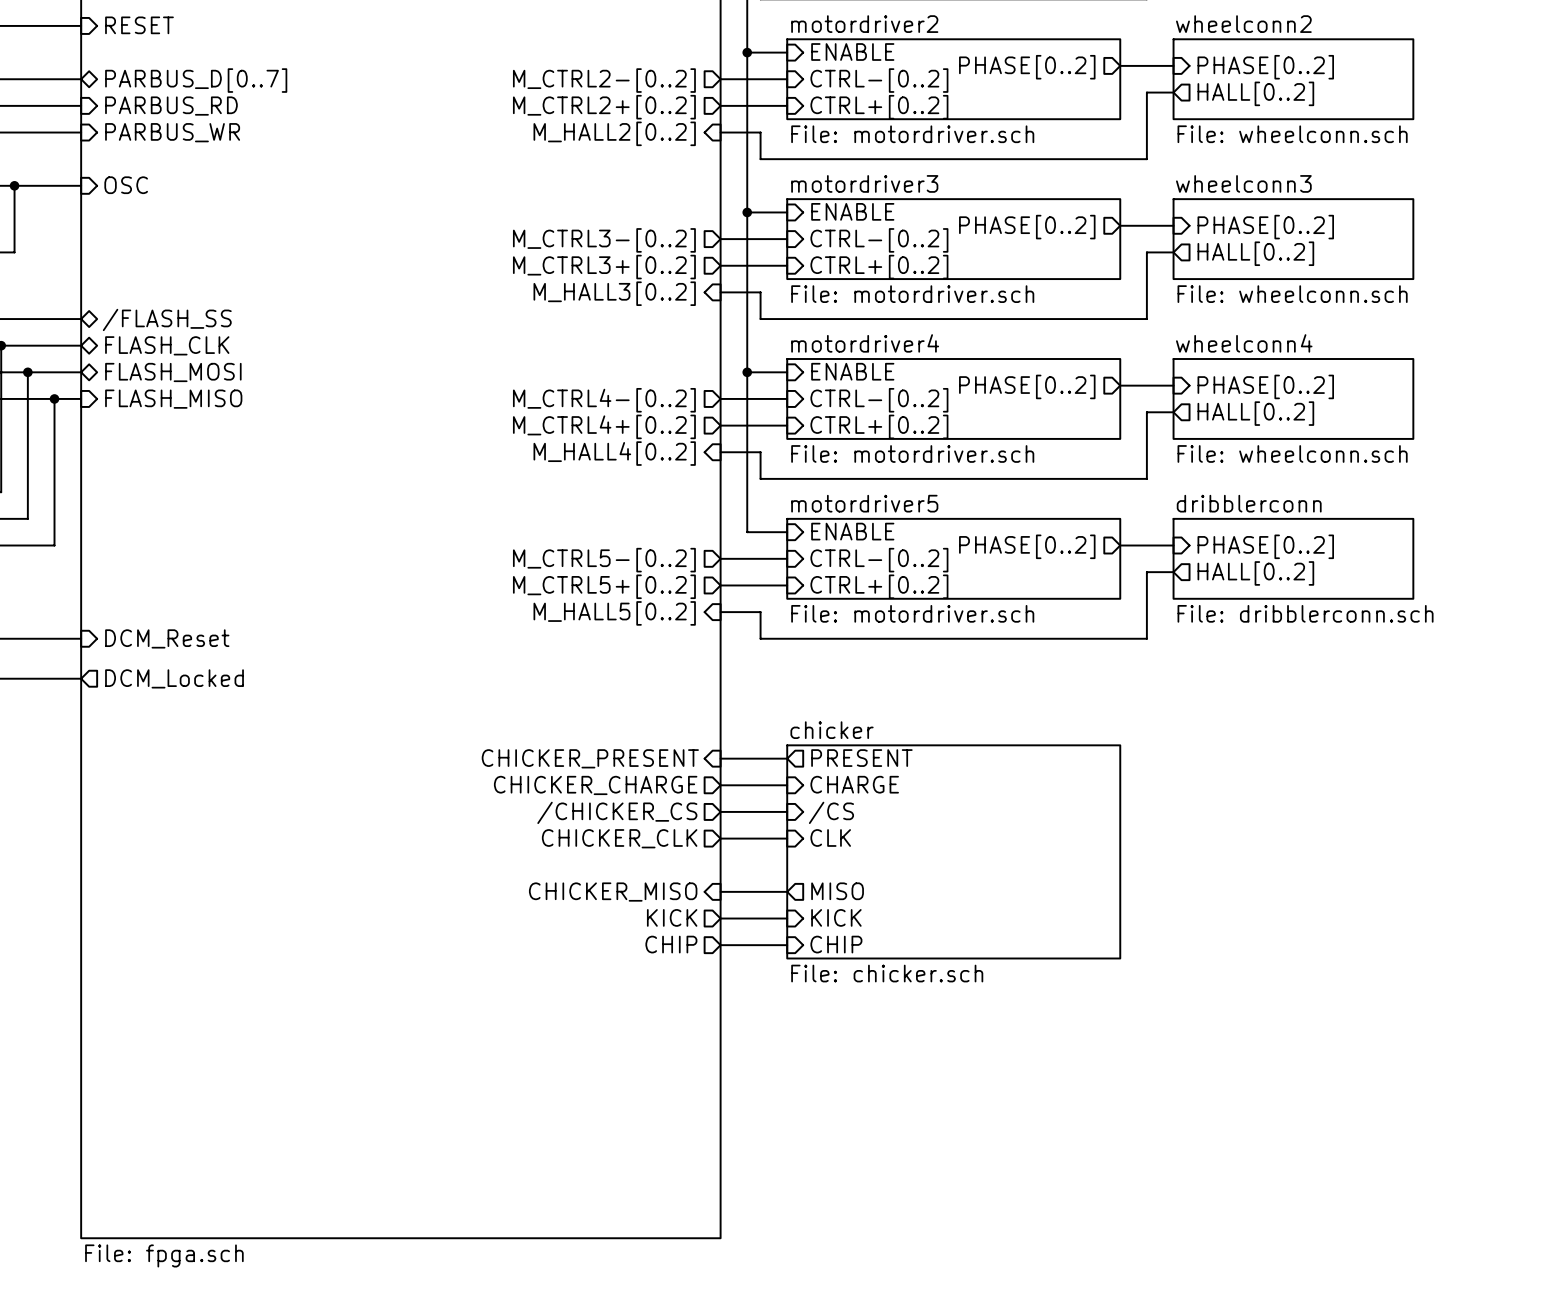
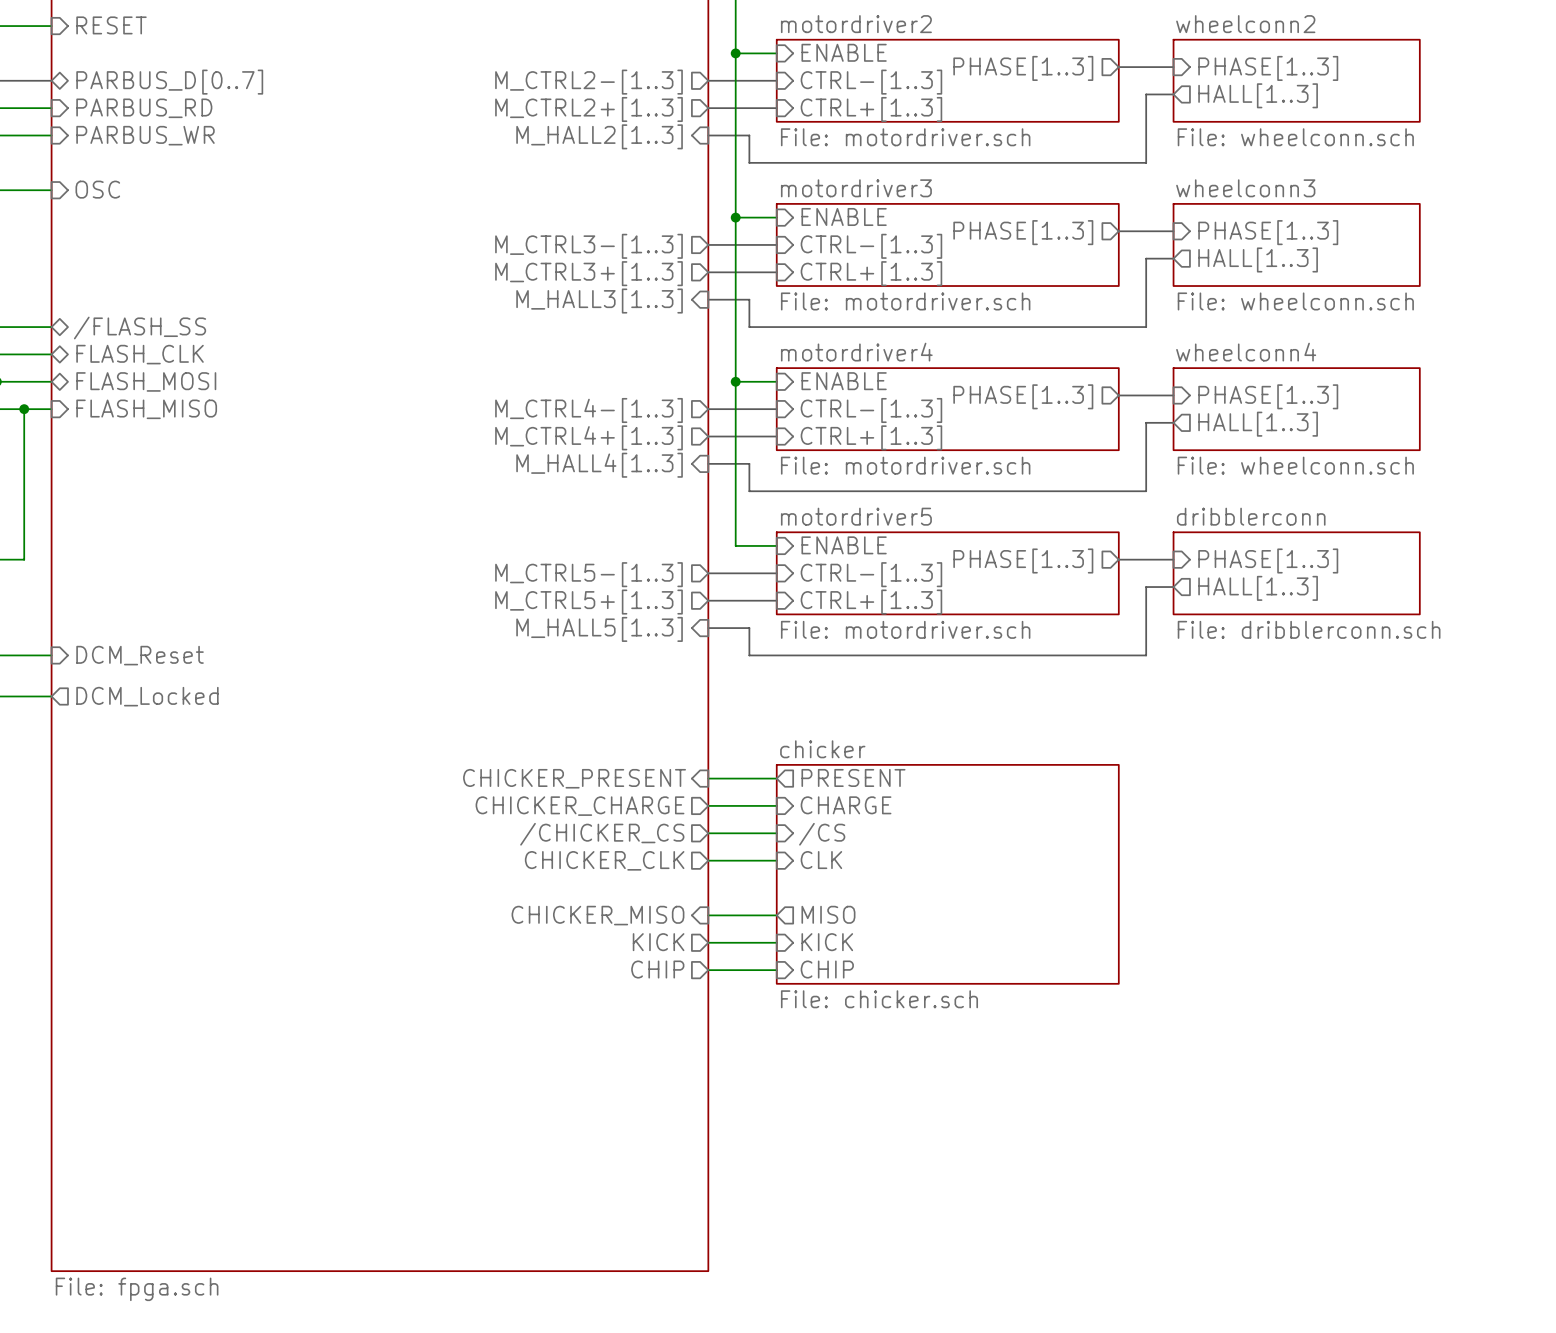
sheet pin: PHASE[0..2] (1027, 67) -> PHASE[1..3] (1023, 68)
sheet pin: PHASE[0..2] (1265, 67) -> PHASE[1..3] (1268, 68)
sheet pin: M_CTRL2-[0..2] (604, 80) -> M_CTRL2-[1..3] (589, 82)
sheet pin: CTRL-[0..2] (879, 80) -> CTRL-[1..3] (871, 82)
sheet pin: HALL[0..2] (1255, 93) -> HALL[1..3] (1258, 95)
sheet pin: M_CTRL2+[0..2] (604, 107) -> M_CTRL2+[1..3] (589, 109)
sheet pin: CTRL+[0..2] (879, 107) -> CTRL+[1..3] (871, 109)
sheet pin: M_HALL2[0..2] (614, 133) -> M_HALL2[1..3] (599, 136)
sheet pin: PHASE[0..2] (1027, 227) -> PHASE[1..3] (1023, 232)
sheet pin: PHASE[0..2] (1265, 227) -> PHASE[1..3] (1268, 232)
sheet pin: M_CTRL3-[0..2] (604, 240) -> M_CTRL3-[1..3] (589, 246)
sheet pin: CTRL-[0..2] (879, 240) -> CTRL-[1..3] (871, 246)
sheet pin: HALL[0..2] (1255, 253) -> HALL[1..3] (1258, 259)
sheet pin: M_CTRL3+[0..2] (604, 267) -> M_CTRL3+[1..3] (589, 273)
sheet pin: CTRL+[0..2] (879, 267) -> CTRL+[1..3] (871, 273)
sheet pin: M_HALL3[0..2] (614, 293) -> M_HALL3[1..3] (599, 301)
sheet pin: PHASE[0..2] (1027, 386) -> PHASE[1..3] (1023, 396)
sheet pin: PHASE[0..2] (1265, 386) -> PHASE[1..3] (1268, 396)
sheet pin: M_CTRL4-[0..2] (604, 400) -> M_CTRL4-[1..3] (589, 410)
sheet pin: CTRL-[0..2] (879, 400) -> CTRL-[1..3] (871, 410)
sheet pin: HALL[0..2] (1255, 413) -> HALL[1..3] (1258, 424)
sheet pin: M_CTRL4+[0..2] (604, 426) -> M_CTRL4+[1..3] (589, 437)
sheet pin: CTRL+[0..2] (879, 426) -> CTRL+[1..3] (871, 437)
sheet pin: M_HALL4[0..2] (614, 453) -> M_HALL4[1..3] (599, 465)
sheet pin: PHASE[0..2] (1027, 546) -> PHASE[1..3] (1023, 561)
sheet pin: PHASE[0..2] (1265, 546) -> PHASE[1..3] (1268, 561)
sheet pin: M_CTRL5-[0..2] (604, 560) -> M_CTRL5-[1..3] (589, 574)
sheet pin: CTRL-[0..2] (879, 560) -> CTRL-[1..3] (871, 574)
sheet pin: HALL[0..2] (1255, 573) -> HALL[1..3] (1258, 588)
sheet pin: M_CTRL5+[0..2] (604, 586) -> M_CTRL5+[1..3] (589, 602)
sheet pin: CTRL+[0..2] (879, 586) -> CTRL+[1..3] (871, 602)
sheet pin: M_HALL5[0..2] (614, 613) -> M_HALL5[1..3] (599, 629)

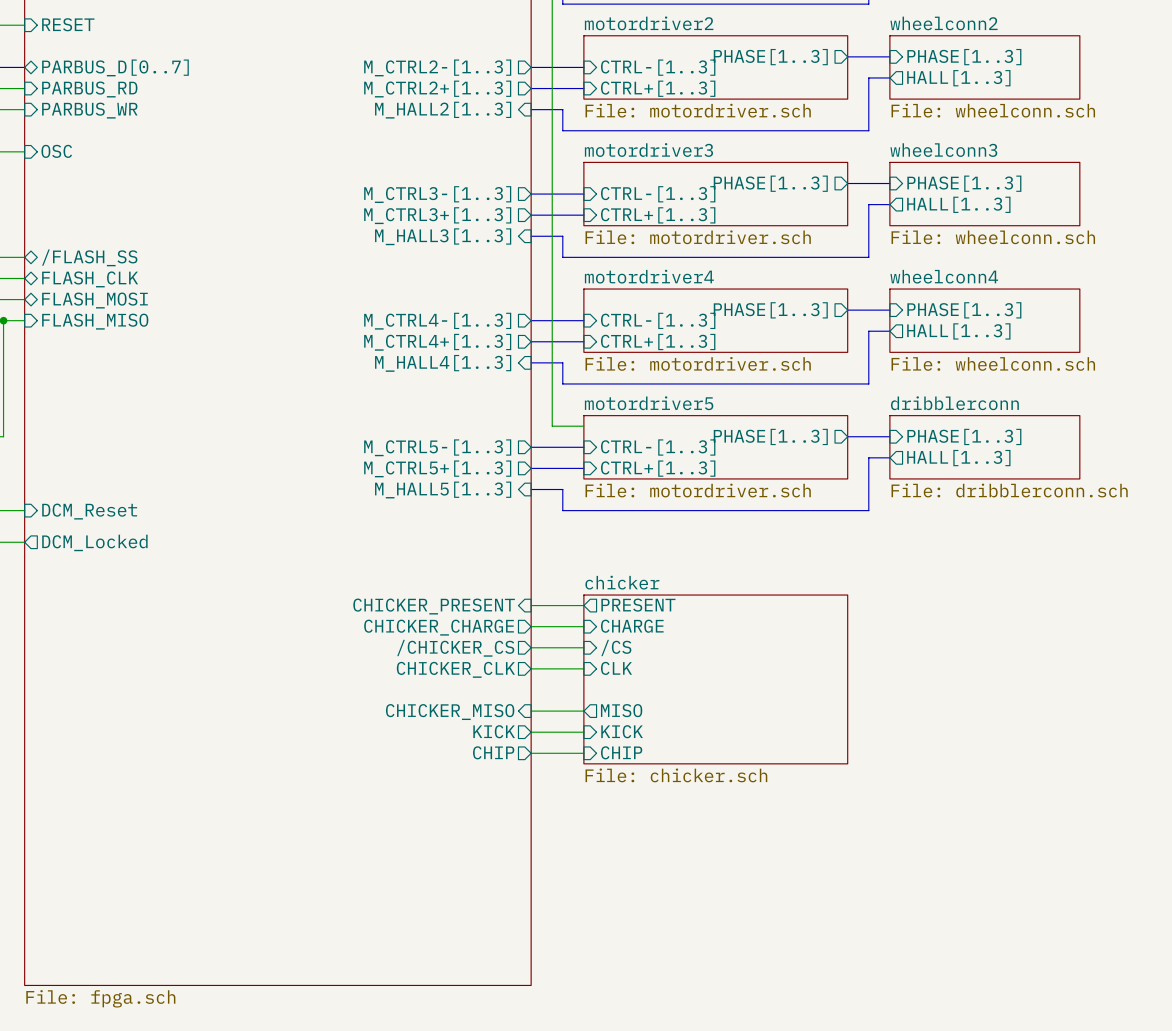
sheet pin: ENABLE (844, 52) -> none
wire: (735, 53) (776, 53) -> none
junction: (735, 53) -> none
sheet pin: ENABLE (844, 216) -> none
wire: (735, 217) (776, 217) -> none
junction: (735, 217) -> none
wire: (735, 381) (776, 381) -> none
junction: (735, 381) -> none
sheet pin: ENABLE (844, 381) -> none
sheet pin: ENABLE (844, 545) -> none

